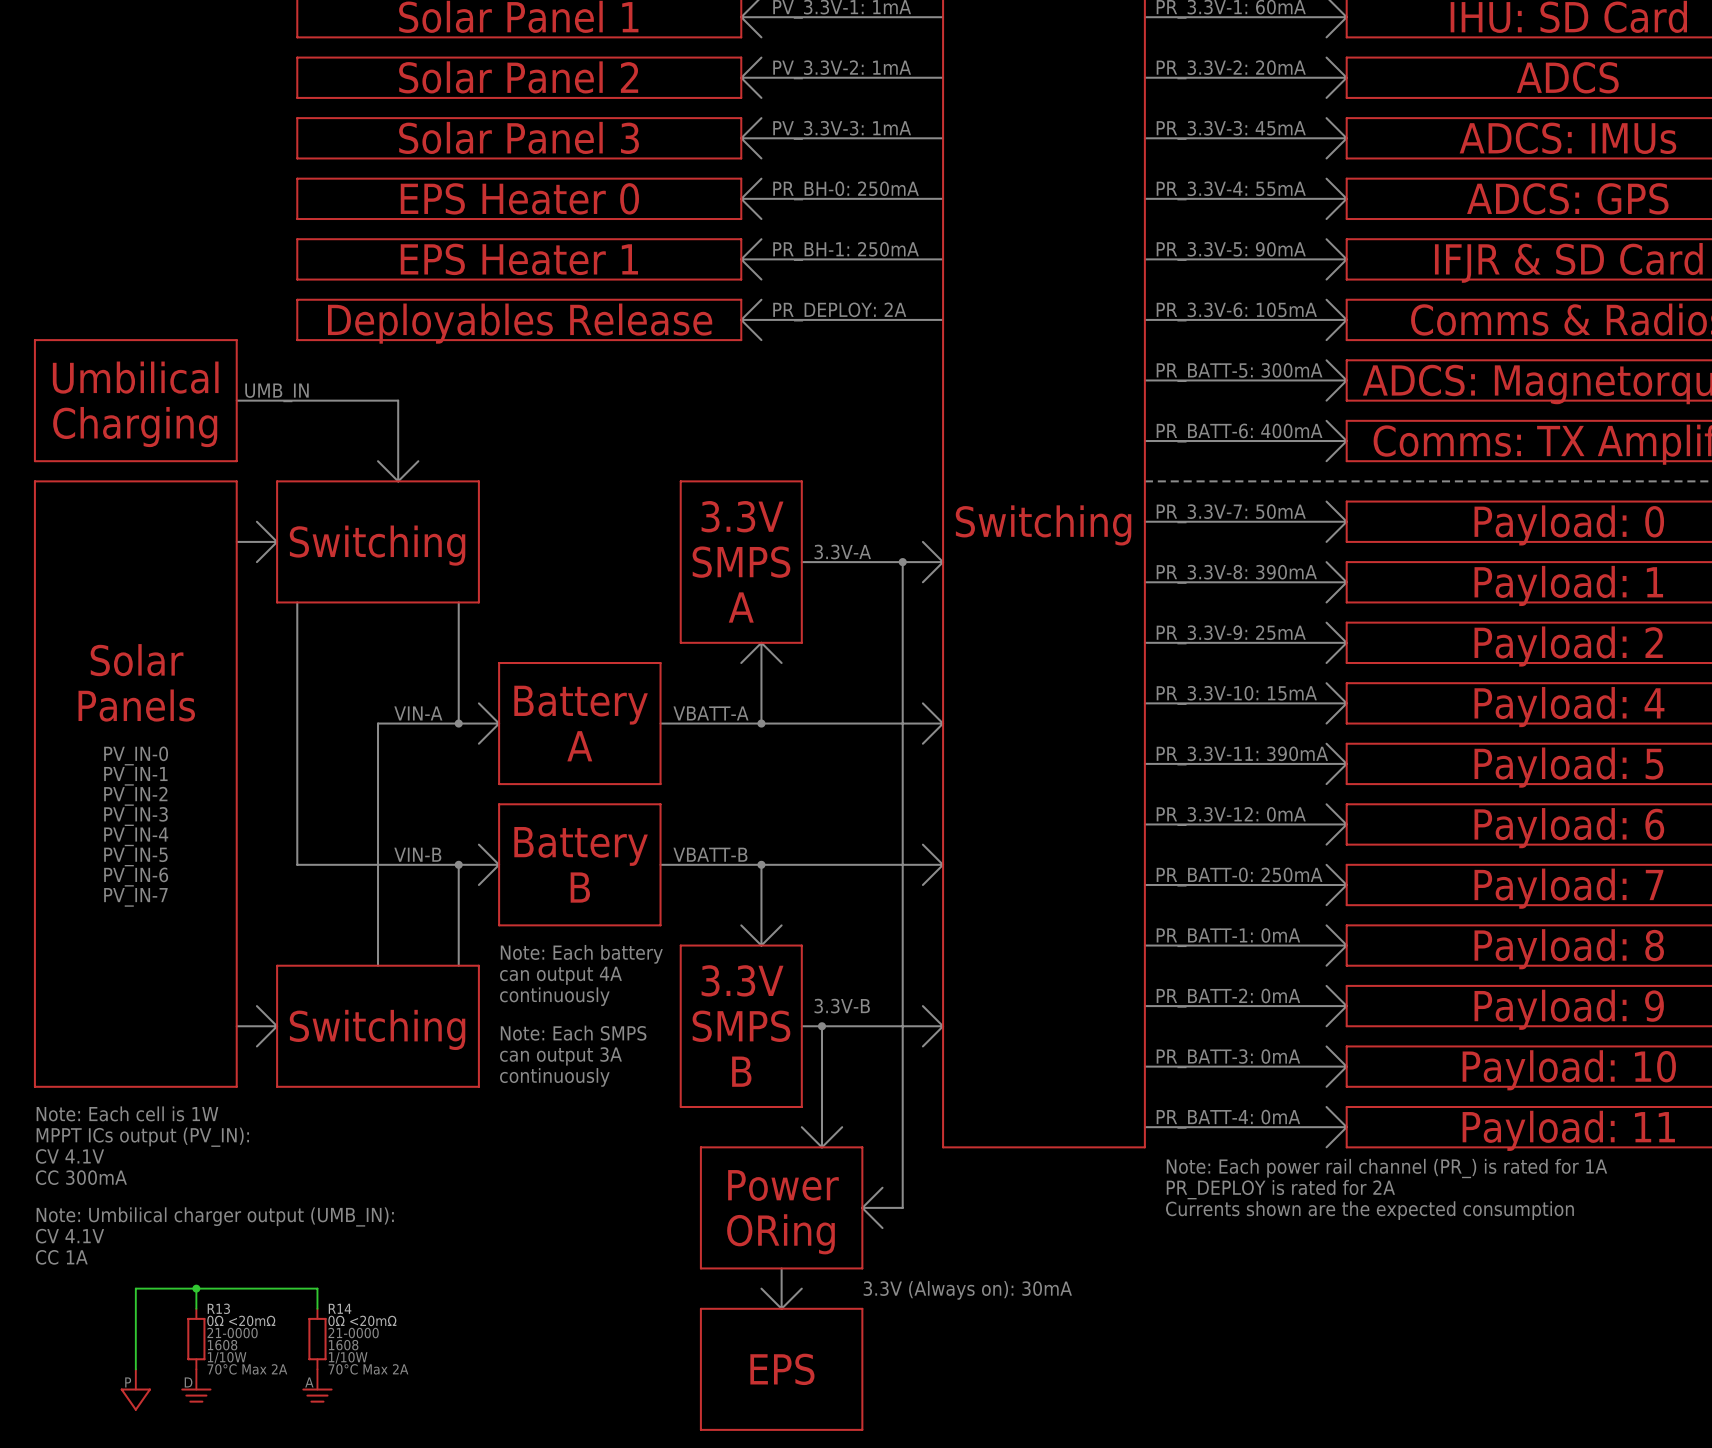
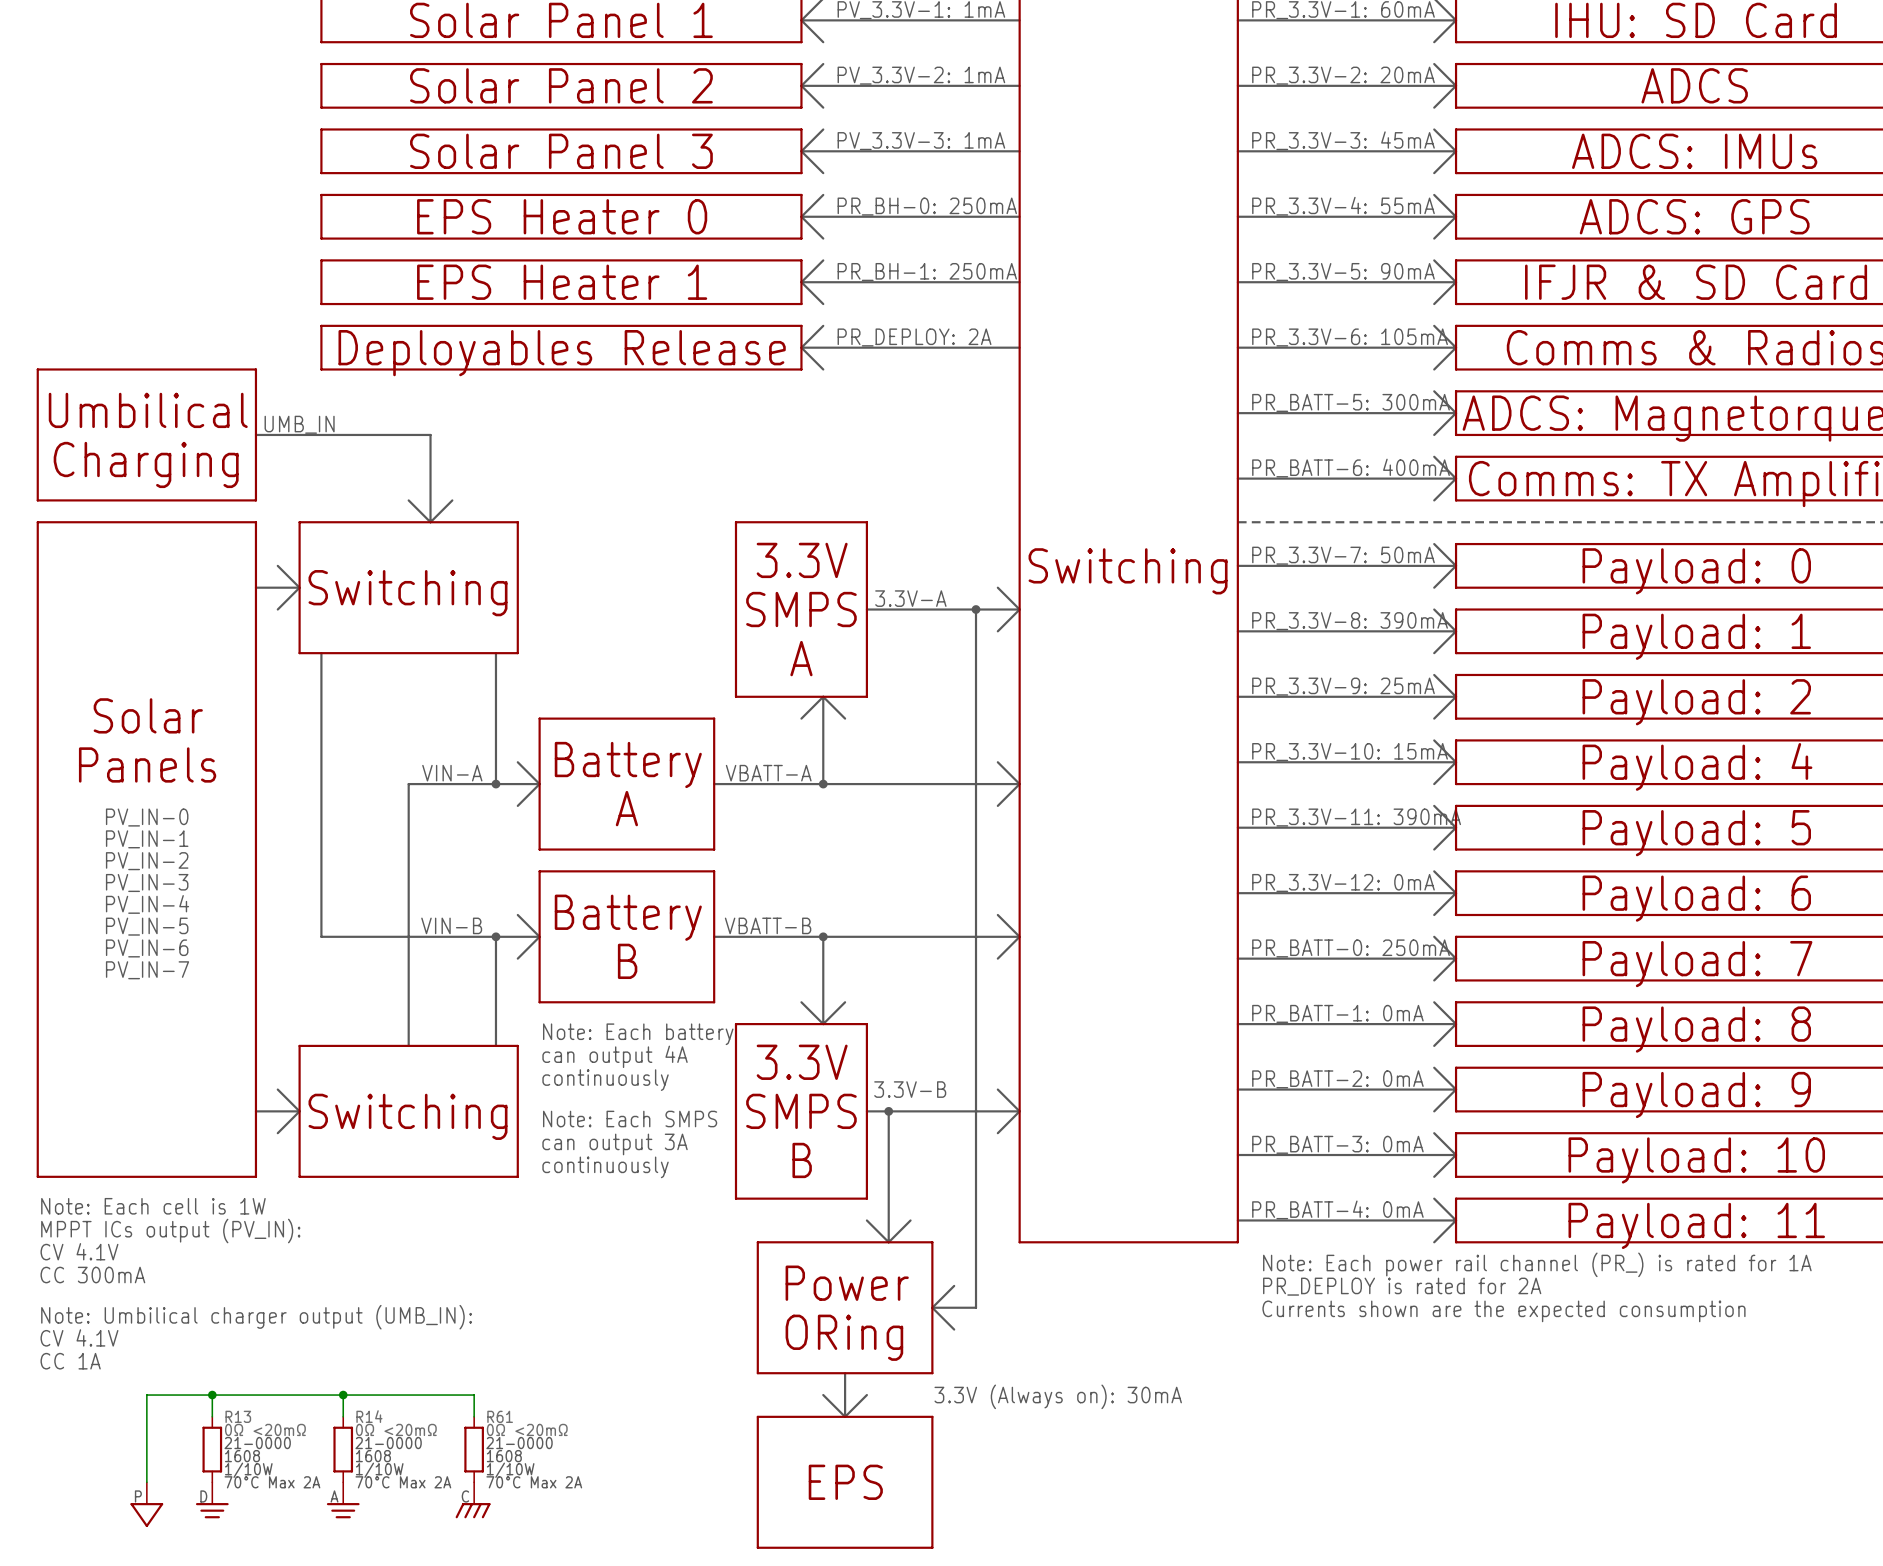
wire: none -> (343, 1395) (474, 1395) (474, 1416)
junction: none -> (343, 1395)
R61: none -> 0Ω <20mΩ (474, 1449)
power symbol: none -> (473, 1500)

